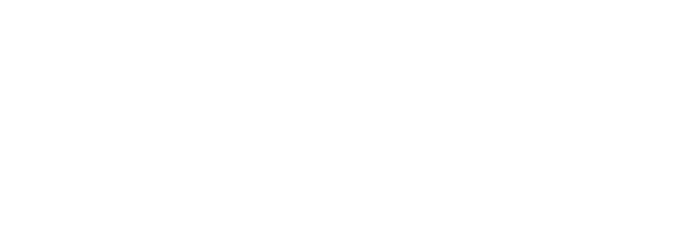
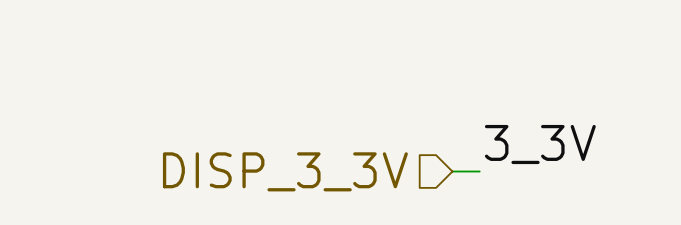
label: none -> 3_3V (540, 144)
hierarchical label: none -> DISP_3_3V (285, 171)
wire: none -> (452, 171) (479, 171)

